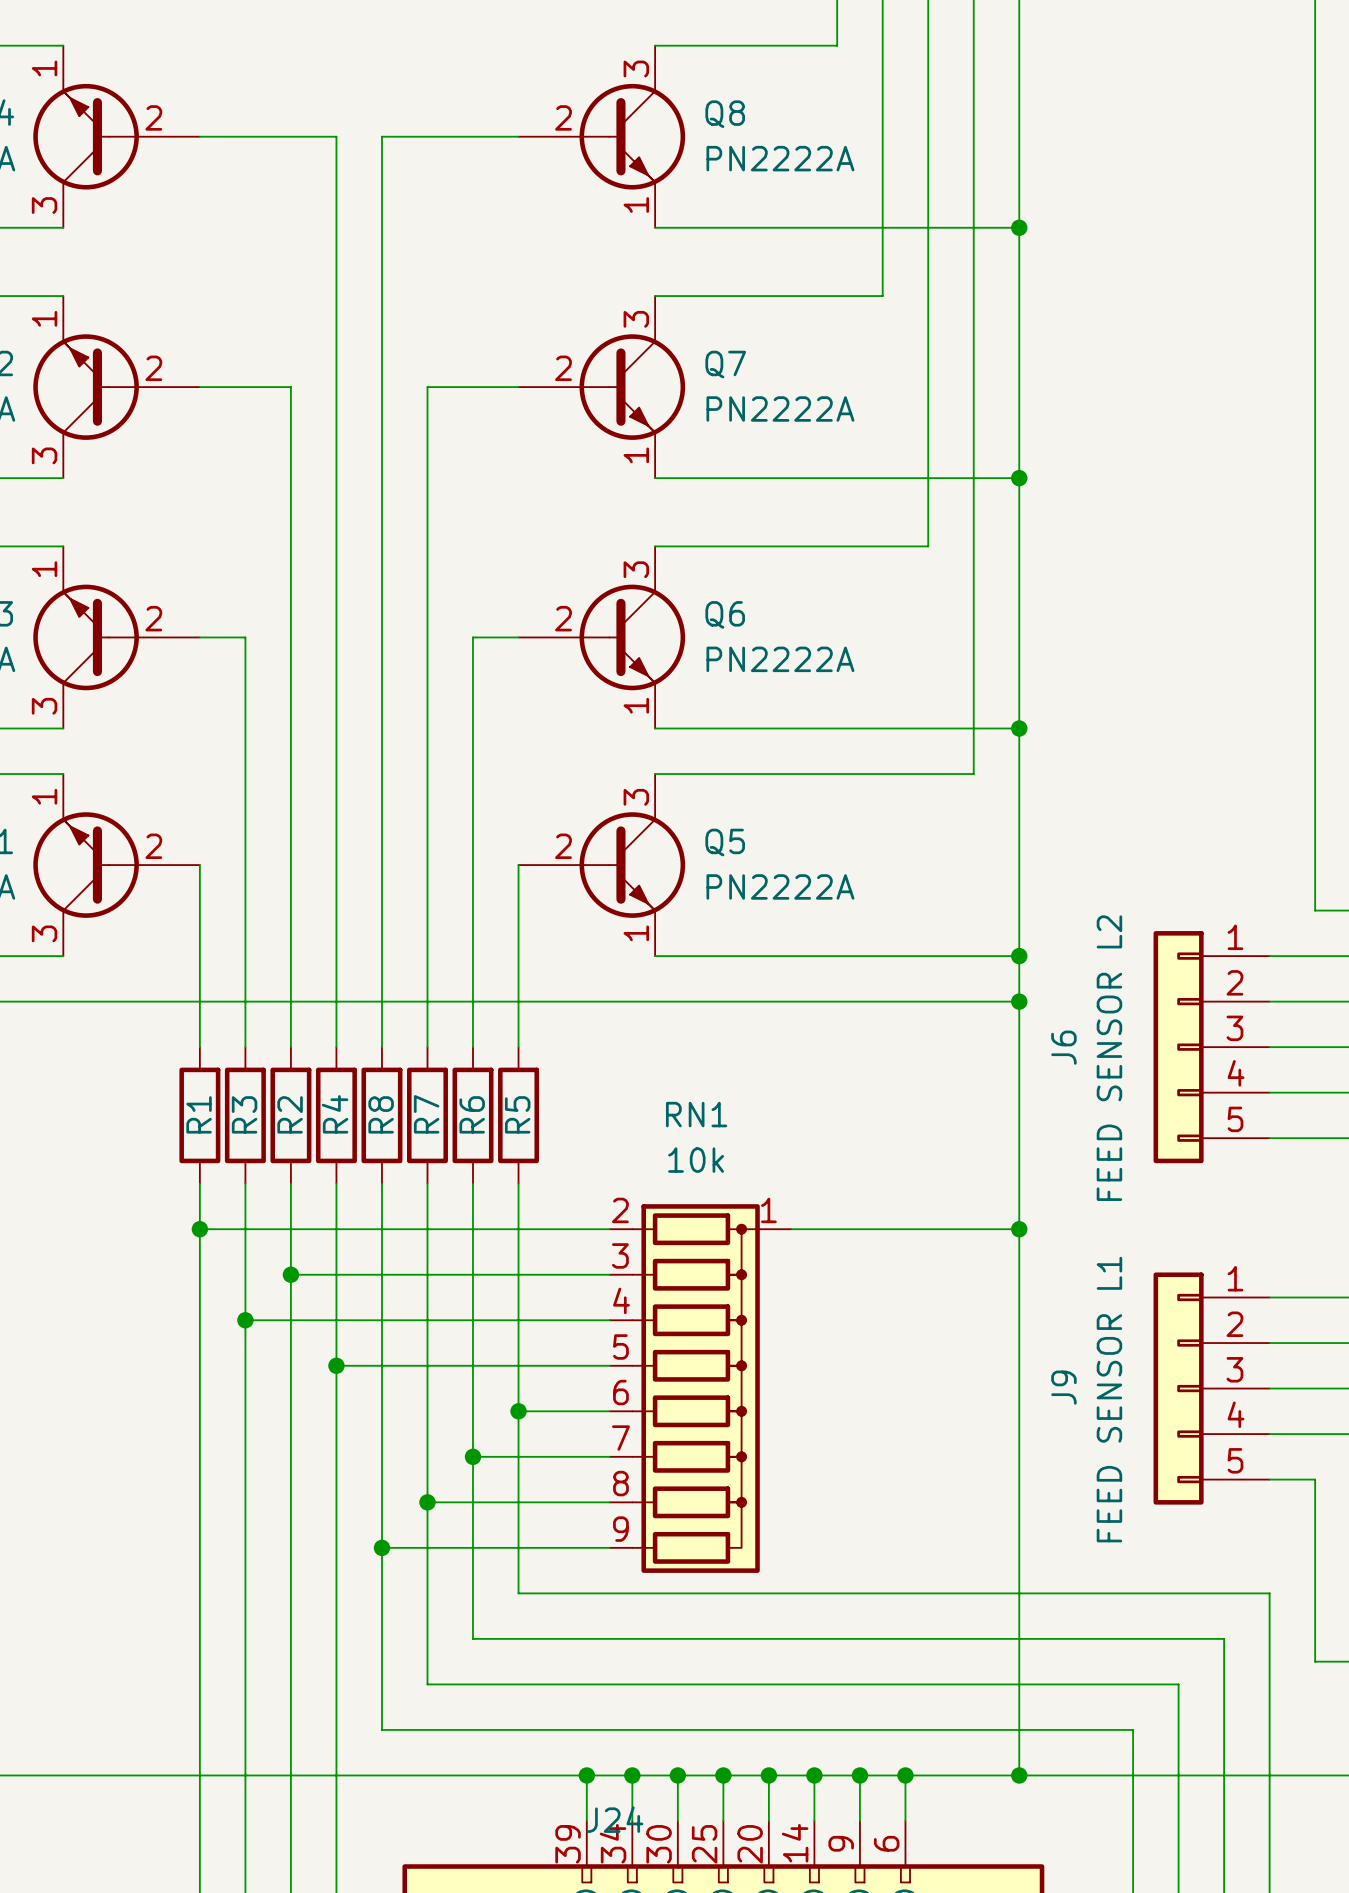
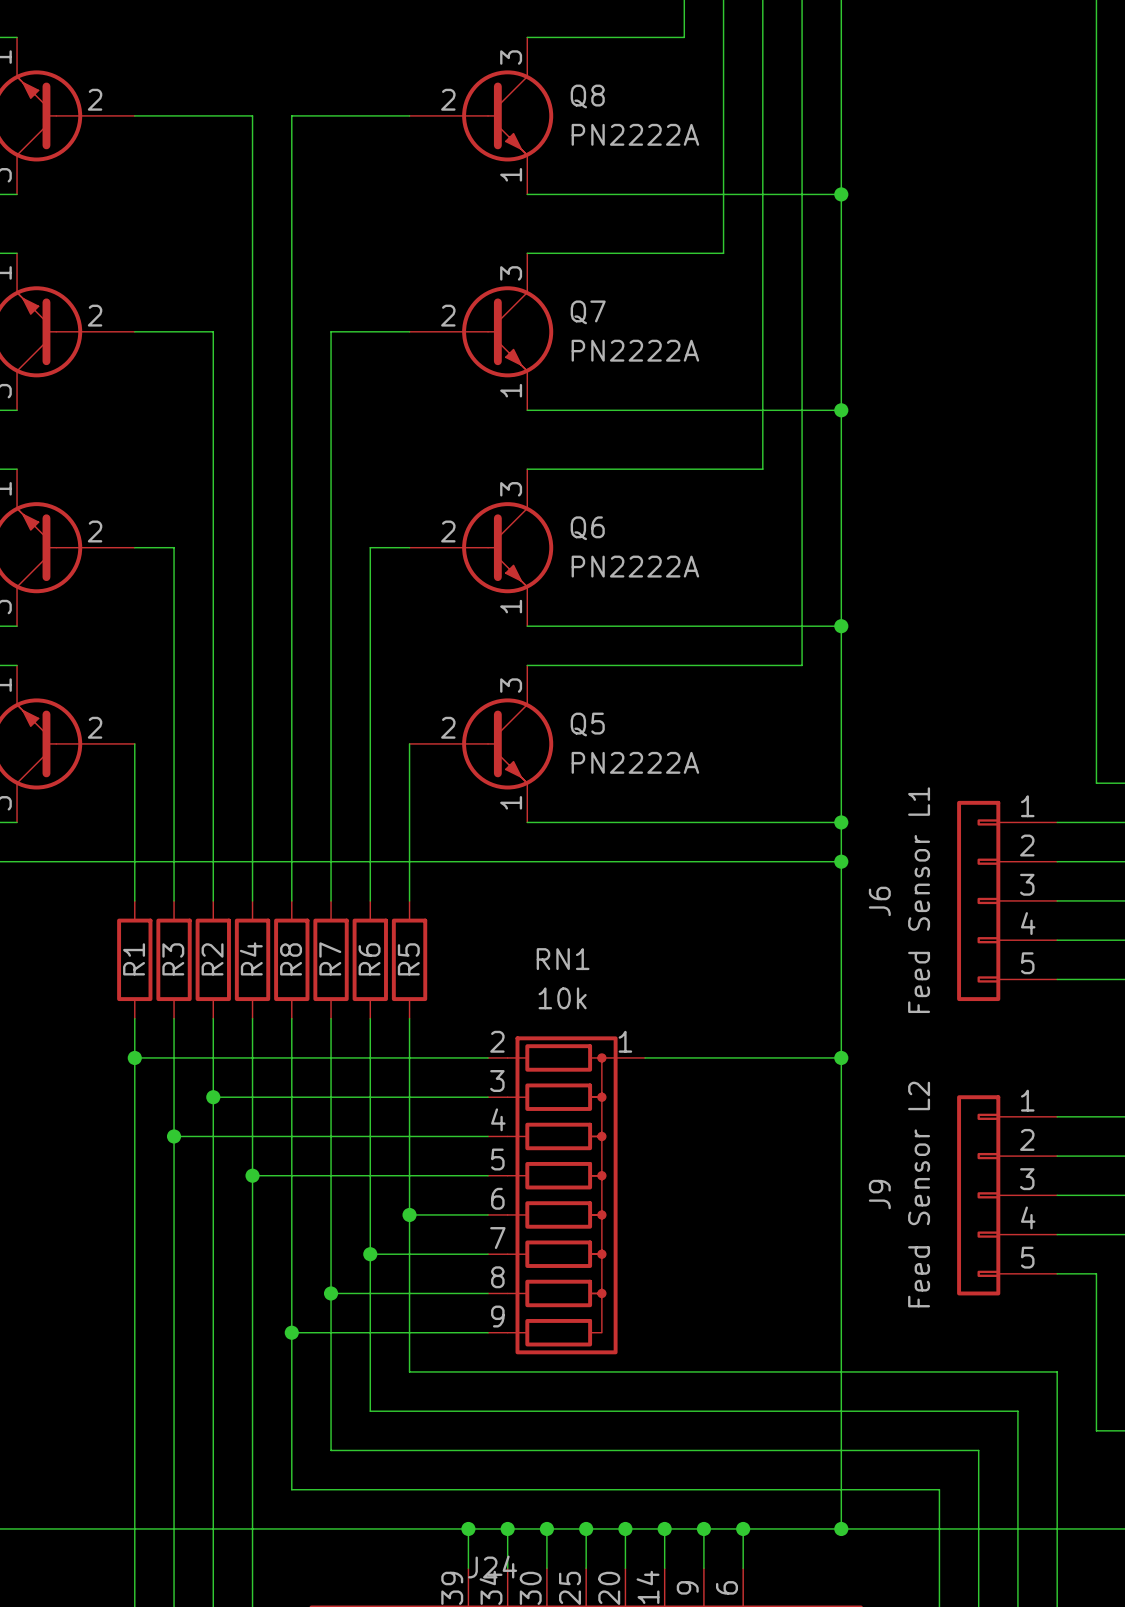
J6 value: FEED SENSOR L2 (1109, 1058) -> Feed Sensor L1 (919, 900)
J9 value: FEED SENSOR L1 (1109, 1399) -> Feed Sensor L2 (919, 1194)

